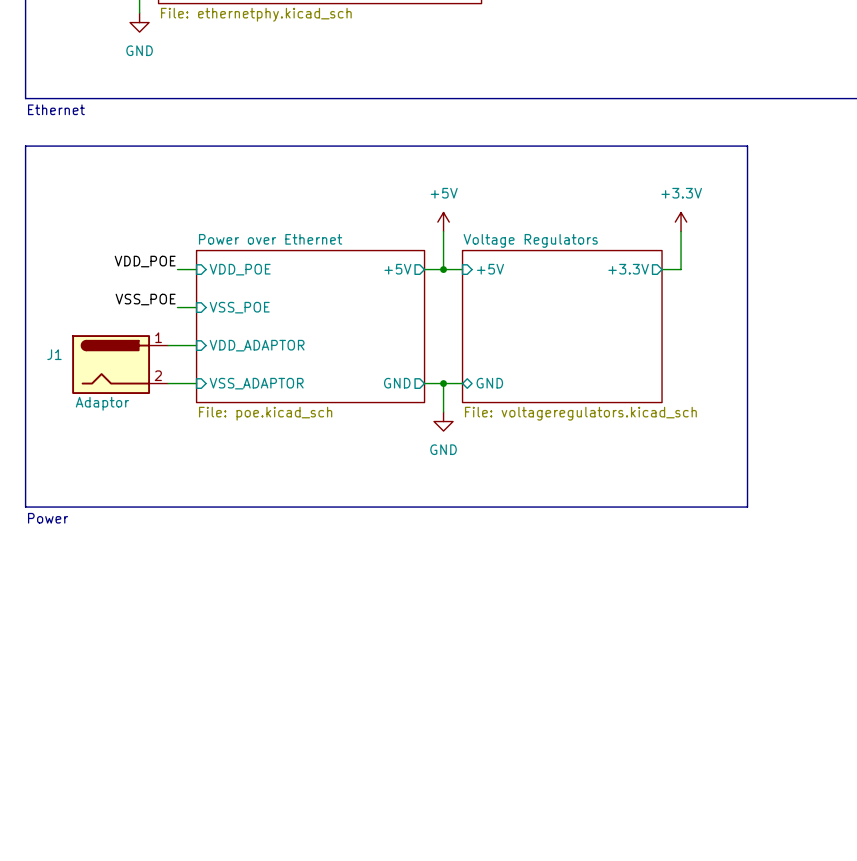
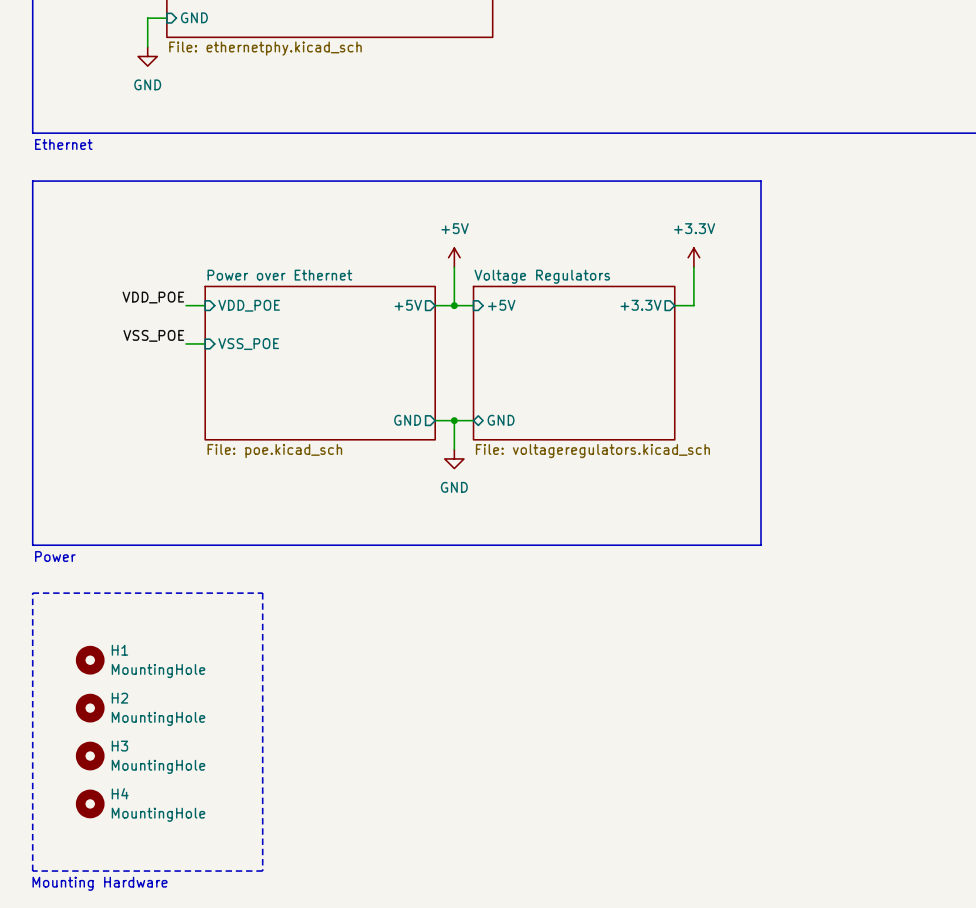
wire: (168, 345) (196, 345) -> none
sheet pin: VDD_ADAPTOR (257, 345) -> none
J1: Adaptor (120, 364) -> none
wire: (168, 383) (196, 383) -> none
sheet pin: VSS_ADAPTOR (256, 383) -> none
line: none -> (32, 593) (262, 593) (262, 871) (32, 871) (32, 593)
H1: none -> MountingHole (90, 660)
H2: none -> MountingHole (90, 708)
H3: none -> MountingHole (90, 756)
H4: none -> MountingHole (90, 803)
text: none -> Mounting Hardware (100, 883)

